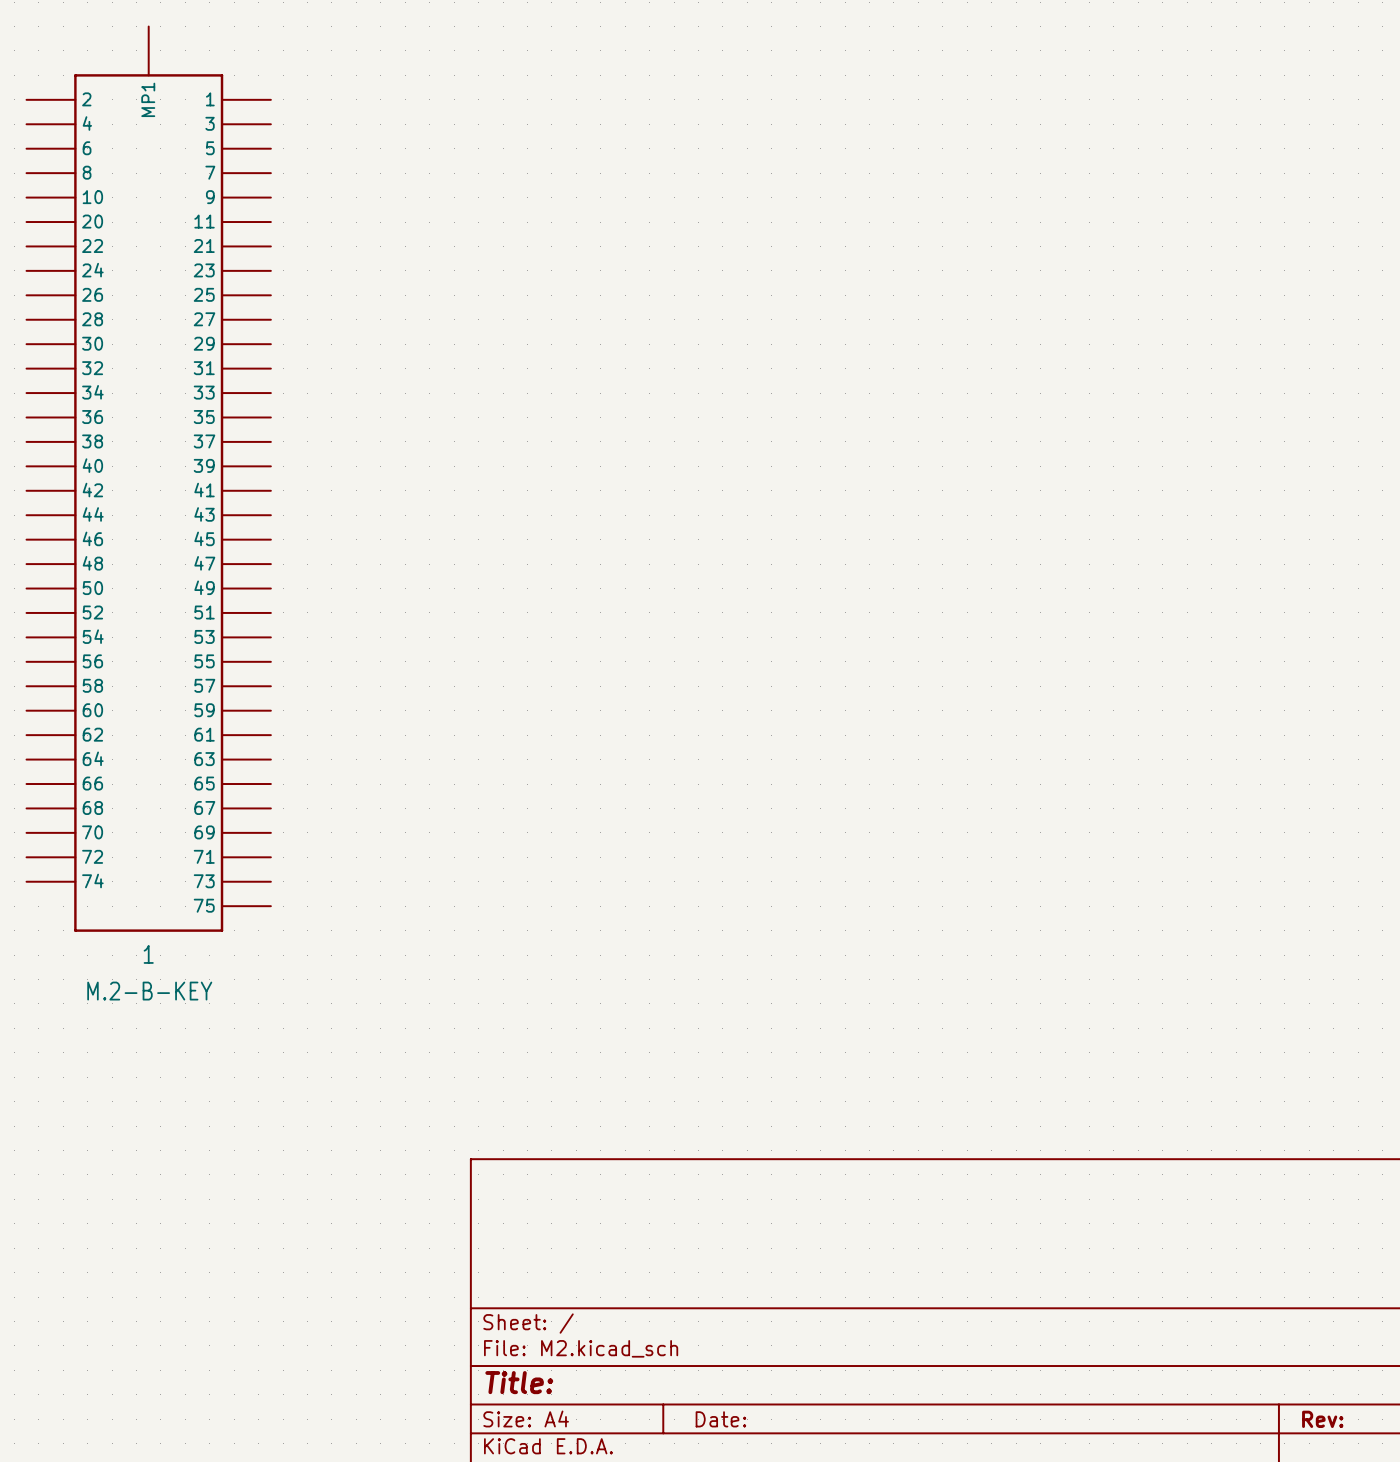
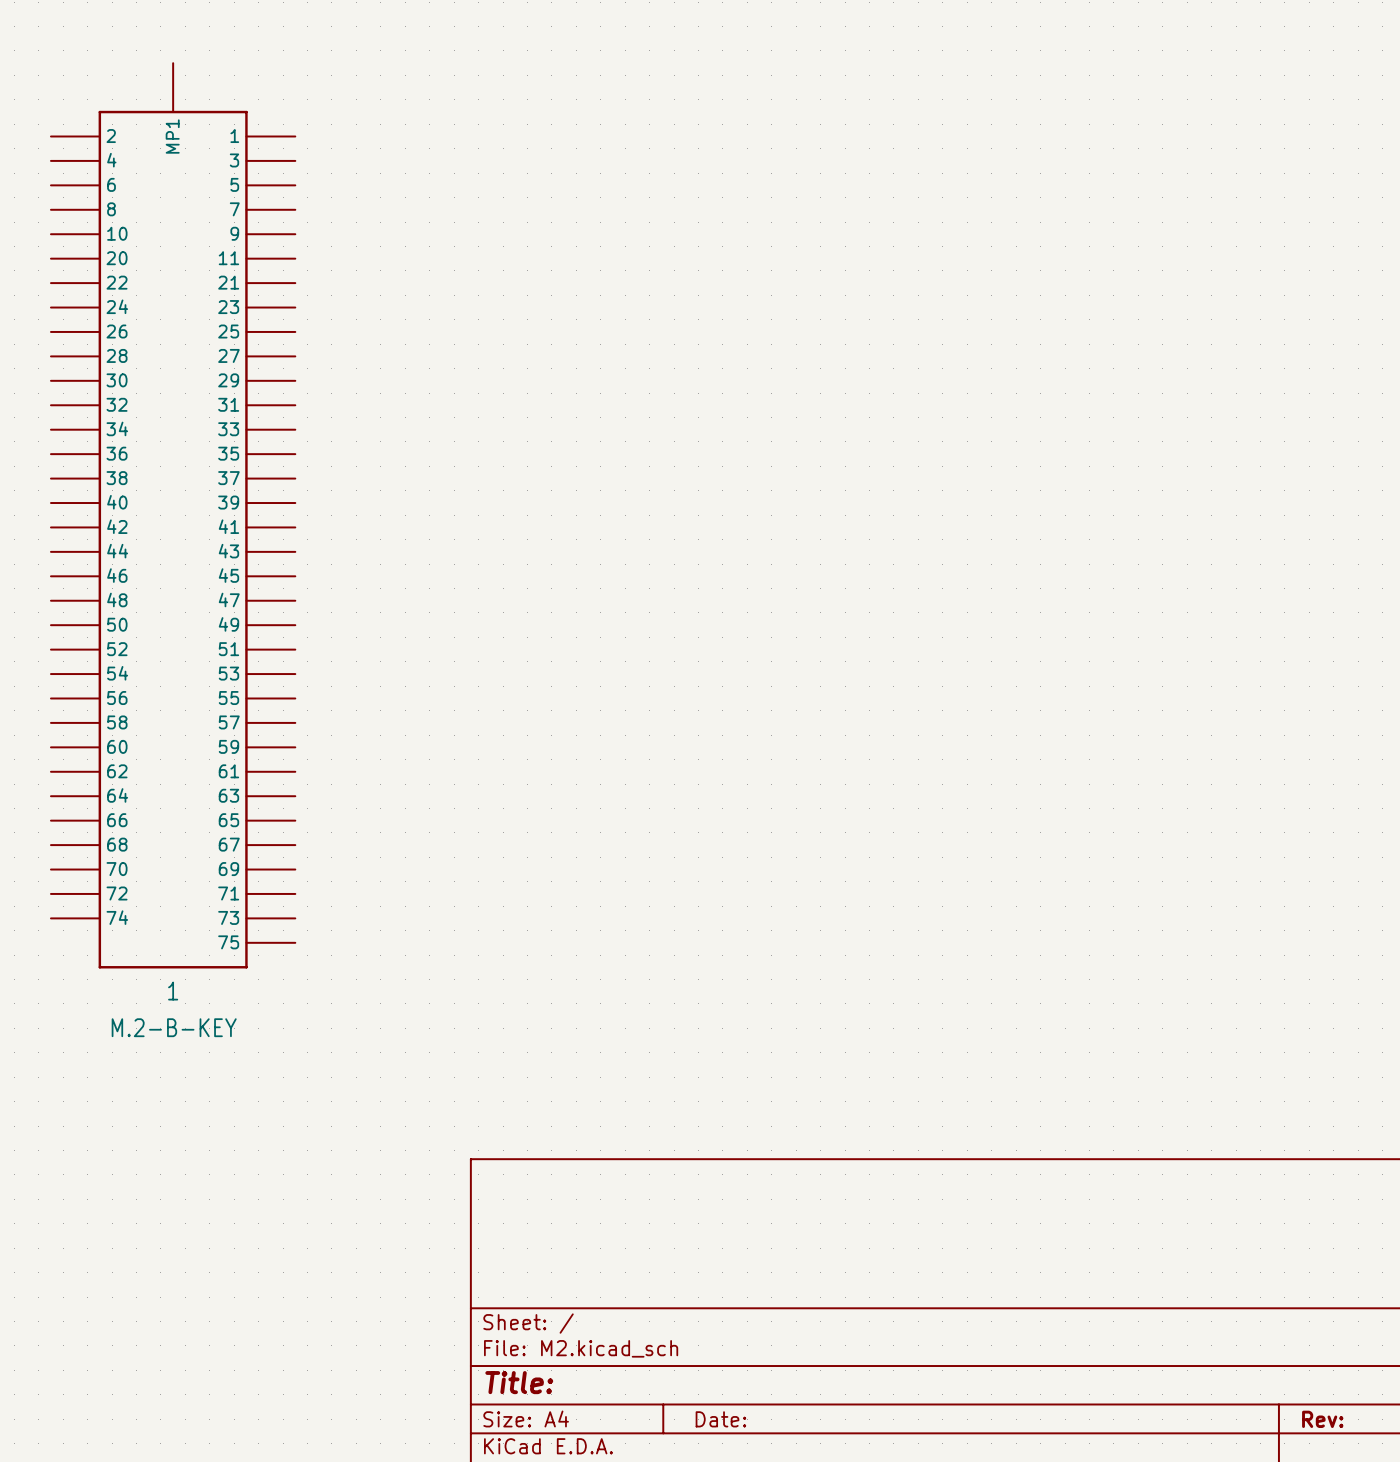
1 position: (148, 479) -> (173, 515)

